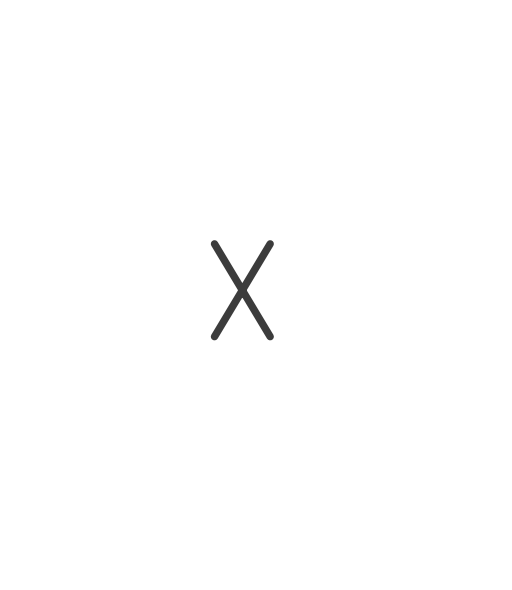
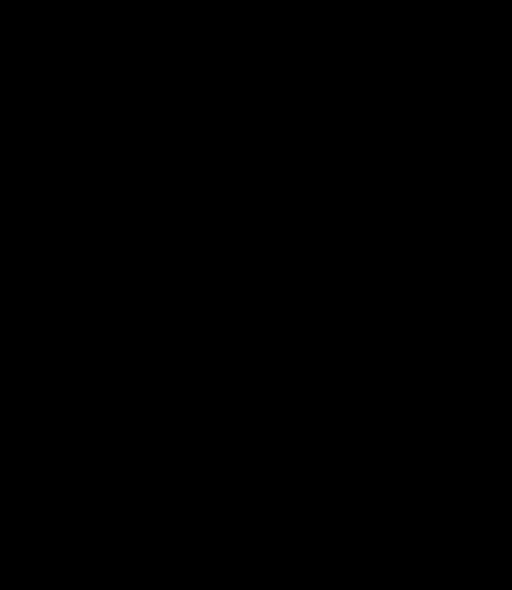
text: X (242, 290) -> none

